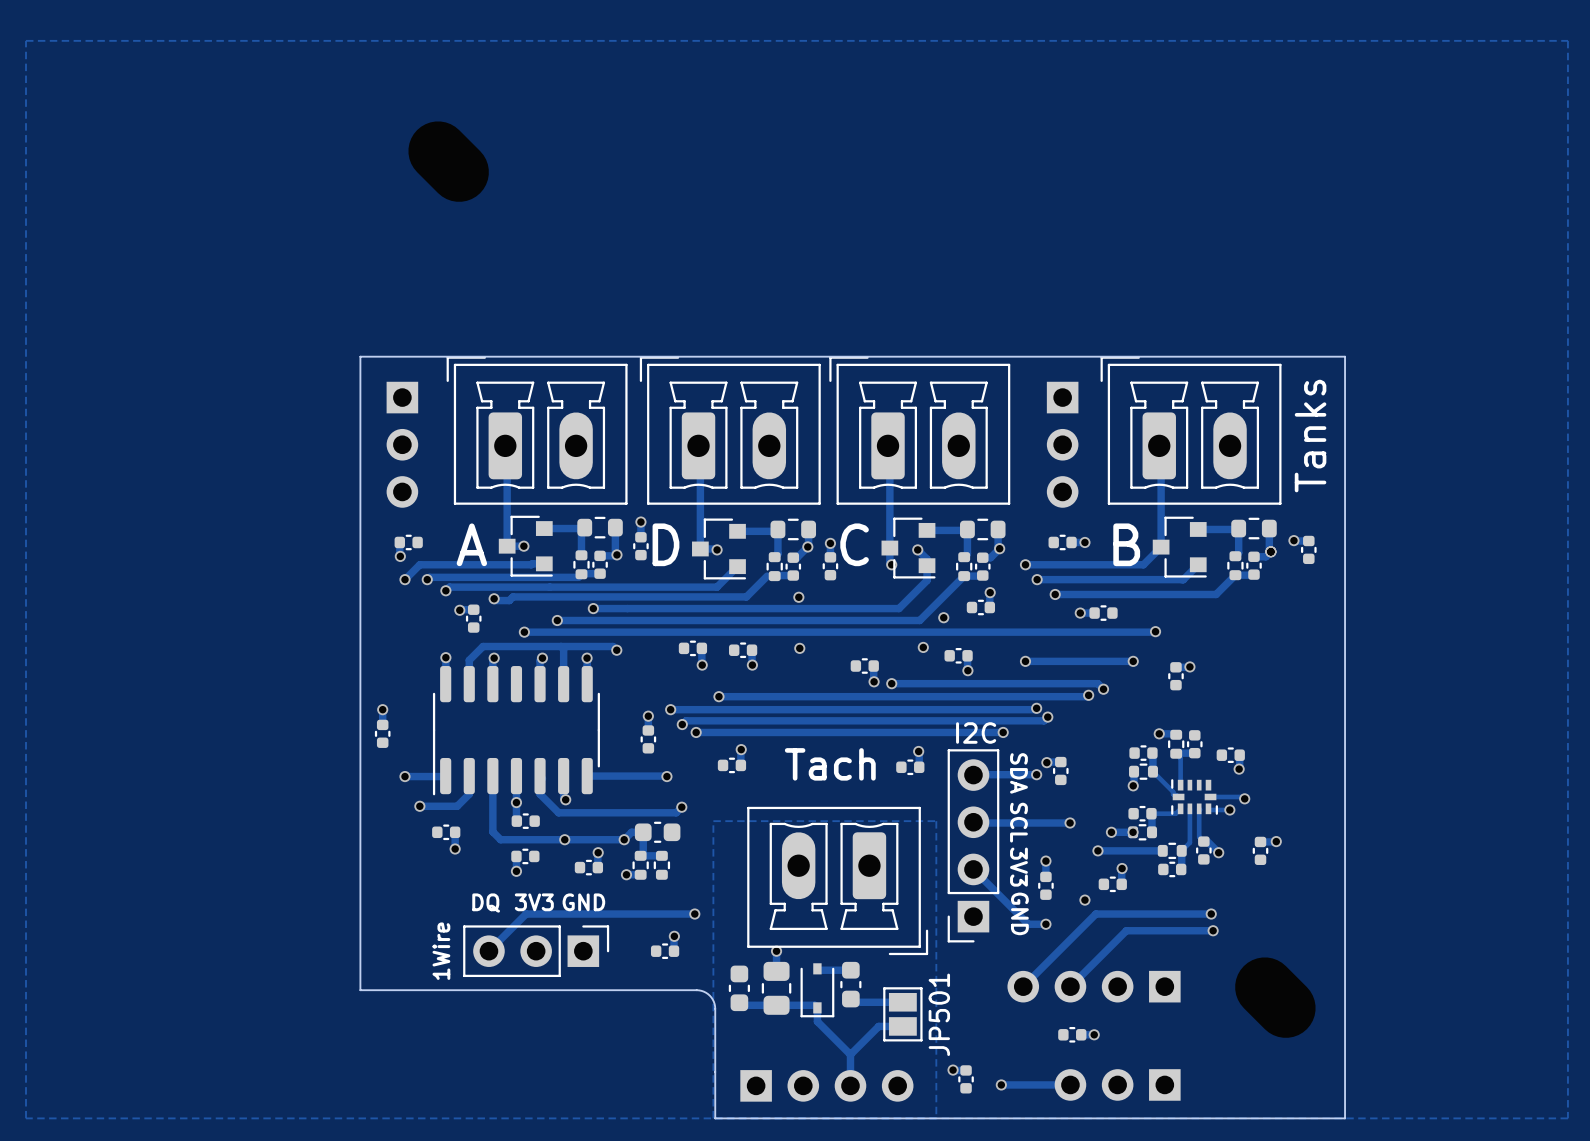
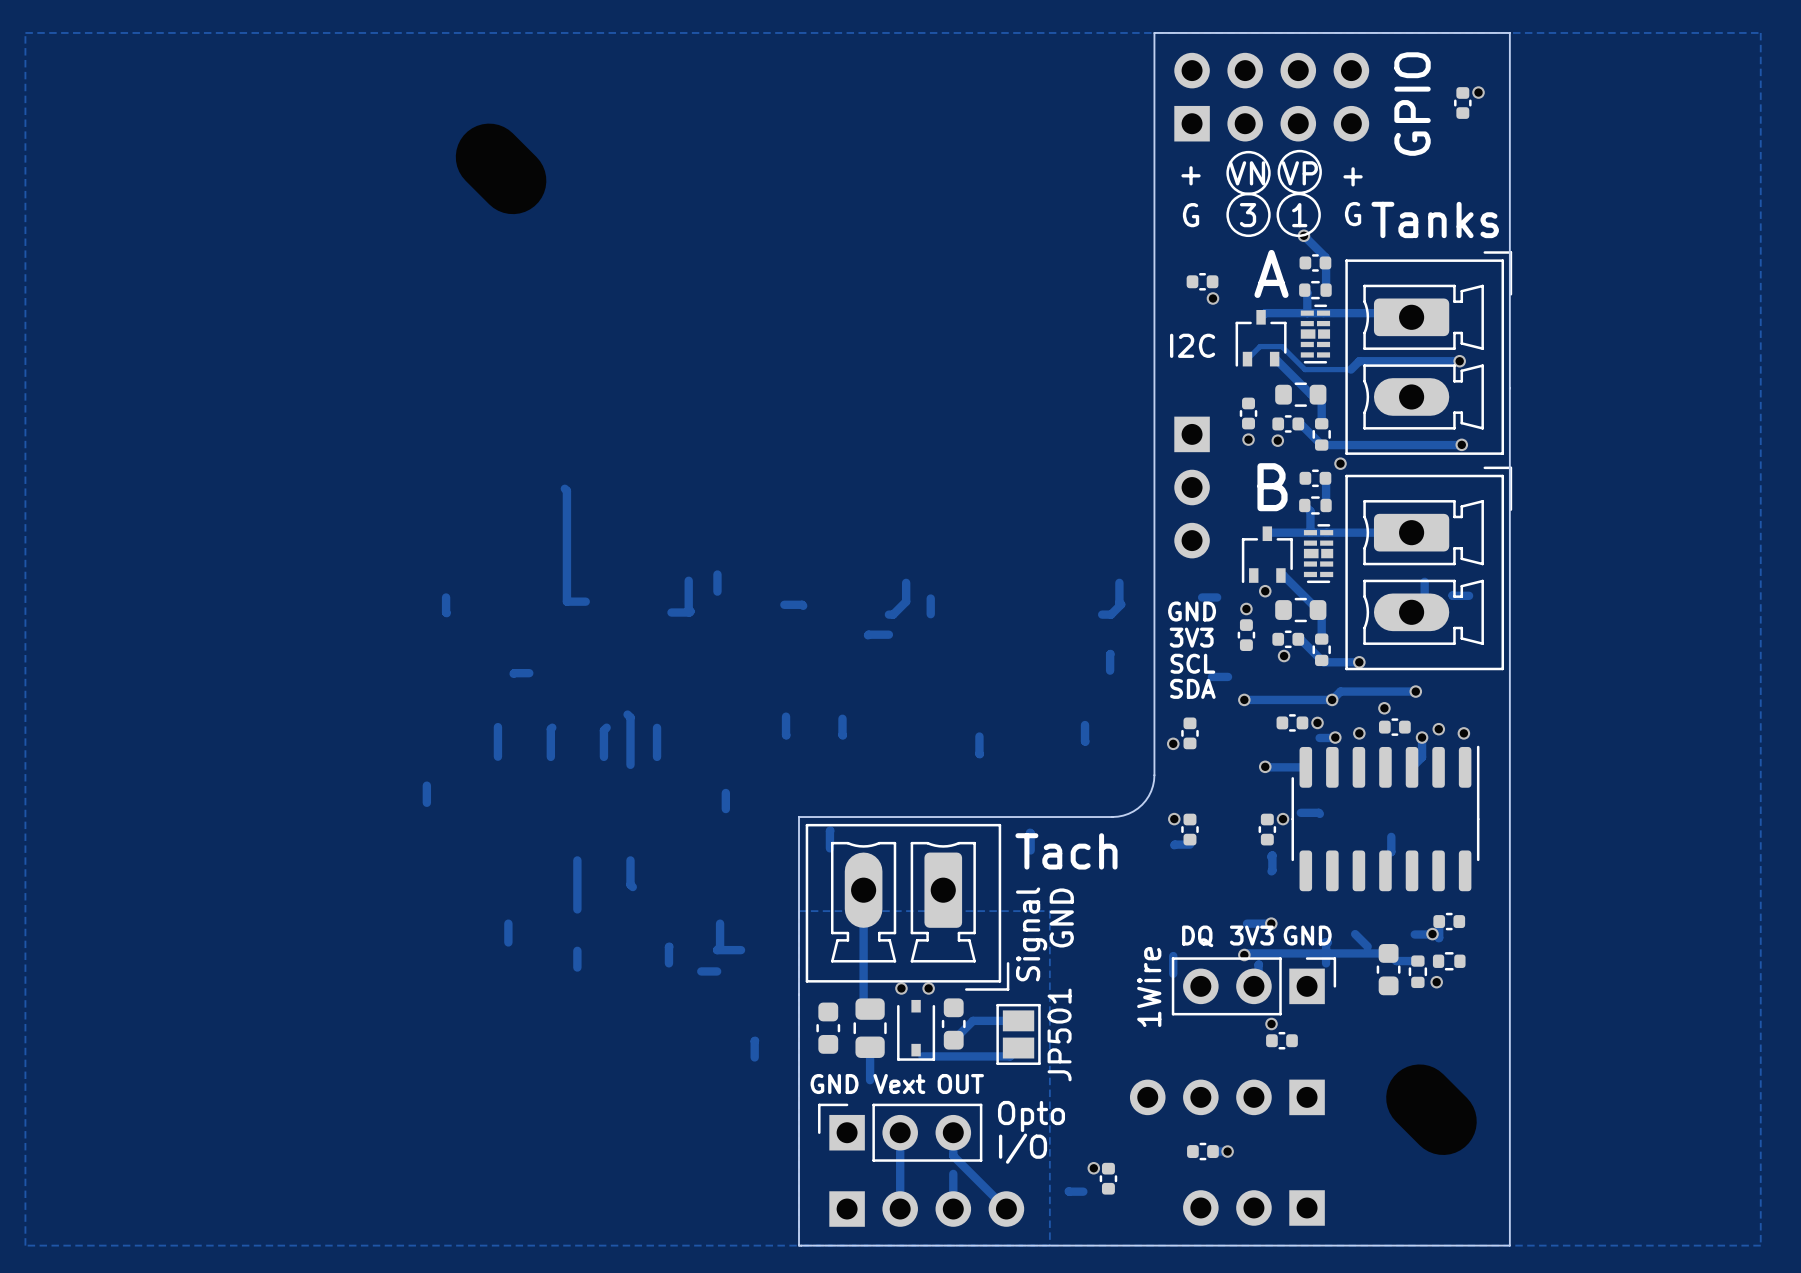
via: none -> (1478, 92)
part: none -> (1271, 97)
part: none -> (1462, 103)
text: none -> GPIO (1412, 104)
drawing: none -> [1226, 149, 1322, 238]
text: none -> VN (1247, 173)
text: none -> VP (1299, 173)
text: none -> + (1191, 175)
text: none -> + (1353, 176)
text: none -> G (1353, 214)
text: none -> G (1191, 215)
text: none -> 3 (1248, 215)
text: none -> 1 (1299, 215)
track: none -> (1303, 235) (1325, 257) (1326, 290)
via: none -> (1303, 235)
part: none -> (1315, 262)
text: none -> A (1271, 273)
part: none -> (1202, 281)
track: none -> (1304, 290) (1307, 292) (1307, 313)
part: none -> (1315, 290)
via: none -> (1212, 298)
track: none -> (1261, 317) (1265, 313) (1407, 313) (1411, 317)
part: none -> (1315, 334)
part: none -> (1261, 338)
part: none -> (1428, 353)
track: none -> (1247, 359) (1260, 346) (1281, 346) (1304, 369) (1350, 369) (1359, 361) (1459, 361)
track: none -> (1274, 359) (1311, 394) (1318, 394) (1321, 398) (1321, 423)
via: none -> (1459, 361)
board edge: (1345, 356) (360, 356) (360, 990) (703, 991) (711, 997) (715, 1006) (715, 1118) -> (1509, 388) (1509, 32) (1154, 32) (1153, 786) (1142, 804) (1133, 811) (1118, 816) (799, 817) (799, 1245) (801, 1245)
part: none -> (1300, 394)
part: none -> (1248, 413)
part: none -> (1288, 423)
track: none -> (1298, 423) (1300, 423) (1321, 445) (1461, 445)
part: none -> (1321, 434)
via: none -> (1248, 439)
via: none -> (1277, 440)
via: none -> (1461, 444)
via: none -> (1340, 463)
part: (537, 430) -> none
part: (730, 430) -> none
part: (919, 430) -> none
part: (1191, 430) -> none
part: none -> (1315, 478)
track: none -> (1325, 478) (1326, 505)
text rotation: 0° (1310, 436) -> 90° clockwise (1435, 219)
text position: Tanks (1310, 436) -> Tanks (1435, 219)
part: (402, 444) -> none
track: (698, 445) (700, 447) (699, 549) -> none
track: (888, 445) (889, 447) (889, 562) (891, 564) -> none
track: (1159, 445) (1161, 447) (1161, 547) (1143, 564) (1025, 564) -> none
track: none -> (1304, 505) (1310, 511) (1310, 532)
part: none -> (1315, 505)
track: none -> (1411, 532) (1267, 533)
part: none -> (1318, 553)
part: none -> (1267, 554)
part: none -> (1428, 568)
via: (640, 522) -> none
track: none -> (1280, 575) (1283, 575) (1321, 613) (1321, 639)
track: (584, 527) (581, 530) (581, 555) -> none
part: (600, 527) -> none
track: (544, 528) (583, 528) -> none
part: (1254, 528) -> none
part: (793, 529) -> none
part: (982, 529) -> none
track: (1198, 529) (1238, 528) (1238, 552) (1235, 556) -> none
track: (927, 530) (967, 529) (967, 553) (964, 557) -> none
track: (737, 531) (776, 531) (777, 529) (777, 553) (774, 557) -> none
via: none -> (1265, 591)
via: (1293, 540) -> none
part: (408, 542) -> none
part: (1062, 542) -> none
via: (1084, 542) -> none
via: (830, 543) -> none
text: A (471, 544) -> none
text: D (665, 544) -> none
text: C (854, 544) -> none
text position: B (1126, 544) -> B (1272, 487)
via: (523, 546) -> none
part: (525, 546) -> none
part: (640, 546) -> none
via: (807, 546) -> none
part: (1179, 547) -> none
part: (719, 548) -> none
part: (908, 548) -> none
via: (999, 548) -> none
via: (717, 549) -> none
track: (917, 549) (927, 559) (927, 580) (899, 608) (593, 608) -> none
via: (917, 549) -> none
part: (1308, 549) -> none
via: (1270, 551) -> none
via: none -> (1246, 608)
part: none -> (1300, 610)
via: (616, 554) -> none
text: none -> GND (1192, 611)
via: (400, 556) -> none
track: (544, 563) (419, 564) (404, 579) -> none
part: (581, 564) -> none
part: (600, 564) -> none
via: (891, 564) -> none
via: (1025, 564) -> none
track: (1198, 564) (1183, 579) (1159, 579) -> (1359, 662) (1323, 662) (1300, 639)
part: (1235, 565) -> none
part: (1254, 565) -> none
track: (737, 566) (717, 587) (449, 587) (445, 590) -> none
part: (774, 566) -> none
part: (793, 566) -> none
part: (830, 566) -> none
part: (964, 566) -> none
part: (982, 566) -> none
track: (600, 573) (582, 573) (578, 577) (429, 577) (427, 579) -> none
track: (1254, 574) (1235, 575) (1216, 594) (1055, 594) -> none
track: (982, 575) (964, 576) (919, 620) (557, 620) -> none
part: none -> (1246, 635)
track: (767, 576) (746, 596) (513, 596) (509, 600) (494, 600) -> none
text: none -> 3V3 (1191, 637)
via: (404, 579) -> none
via: (427, 579) -> none
track: (1037, 579) (1157, 579) -> none
via: (1037, 579) -> none
part: none -> (1288, 639)
part: none -> (1321, 649)
via: (445, 590) -> none
via: (990, 592) -> none
via: (1055, 594) -> none
via: none -> (1284, 656)
via: (798, 597) -> none
via: (494, 598) -> none
via: none -> (1359, 662)
part: (980, 607) -> none
via: (593, 608) -> none
via: (459, 610) -> none
via: (1080, 613) -> none
part: (1103, 613) -> none
via: (943, 617) -> none
part: (473, 618) -> none
via: (557, 620) -> none
track: none -> (1415, 691) (1340, 691) (1332, 699) (1244, 699)
via: none -> (1415, 691)
track: (1155, 631) (524, 632) -> none
via: (1155, 631) -> none
via: (524, 632) -> none
via: none -> (1244, 699)
via: none -> (1332, 699)
via: none -> (1384, 708)
via: (923, 647) -> none
part: (692, 648) -> none
via: (799, 648) -> none
track: (616, 650) (613, 646) (483, 646) (469, 660) (469, 684) -> none
via: (616, 650) -> none
part: (743, 650) -> none
part: none -> (1292, 722)
via: none -> (1317, 722)
part: (958, 655) -> none
via: (445, 657) -> none
part: none -> (1394, 727)
via: (494, 658) -> none
via: (542, 658) -> none
via: (587, 658) -> none
via: none -> (1438, 729)
track: (1025, 661) (1133, 661) -> none
via: (1025, 661) -> none
via: (1133, 661) -> none
part: none -> (1189, 733)
via: none -> (1359, 733)
via: none -> (1463, 733)
via: (702, 665) -> none
via: (752, 665) -> none
part: (864, 666) -> none
track: none -> (1422, 737) (1422, 757) (1412, 767)
via: none -> (1422, 737)
via: (967, 670) -> none
via: none -> (1173, 743)
part: (1175, 676) -> none
via: (874, 681) -> none
track: (891, 683) (1097, 683) (1103, 689) -> none
via: (891, 683) -> none
via: (1103, 689) -> none
track: none -> (1265, 766) (1305, 767)
via: none -> (1265, 766)
track: (1088, 695) (718, 696) -> none
via: (1088, 695) -> none
via: (718, 696) -> none
track: (1036, 708) (670, 709) -> none
via: (1036, 708) -> none
via: (382, 709) -> none
via: (670, 709) -> none
via: (648, 716) -> none
track: (1047, 717) (1044, 720) (686, 720) (682, 724) -> none
via: (1047, 717) -> none
via: (682, 724) -> none
part: (516, 730) -> none
track: (696, 732) (1003, 732) -> none
via: (696, 732) -> none
via: (1003, 732) -> none
part: (382, 733) -> none
text position: I2C (976, 733) -> I2C (1192, 345)
via position: (1159, 733) -> (1283, 819)
part: (648, 739) -> none
via: none -> (1174, 819)
part: (1176, 744) -> none
part: (1194, 744) -> none
part footprint: [1216, 747, 1245, 763] -> [1291, 745, 1480, 892]
via: (741, 749) -> none
via: (918, 751) -> none
part rotation: 0° (1143, 753) -> 90° clockwise (1267, 829)
track: (1152, 753) (1152, 771) (1173, 791) (1174, 795) (1178, 796) -> none
track: (1193, 753) (1176, 753) (1180, 758) (1180, 785) -> none
track: (492, 761) (492, 831) (500, 839) (624, 839) (631, 832) (643, 832) (641, 830) -> none
via: (1046, 762) -> none
text position: Tach (830, 764) -> Tach (1066, 851)
part: (731, 765) -> none
part: (910, 767) -> none
via: (1239, 769) -> none
part position: (1060, 770) -> (1189, 829)
part: (1143, 771) -> none
text rotation: 0° (1018, 773) -> 90° counterclockwise (1192, 688)
text position: SDA (1018, 773) -> SDA (1192, 688)
track: (1036, 774) (973, 775) -> none
via: (1036, 774) -> none
via: (404, 776) -> none
track: (445, 776) (404, 776) -> none
track: (469, 776) (469, 794) (457, 806) (419, 806) -> none
track: (587, 776) (666, 776) -> none
via: (666, 776) -> none
track: (542, 778) (540, 776) (540, 794) (558, 812) (676, 812) (681, 807) -> none
via: (1133, 785) -> none
part: (1194, 796) -> none
track: (1210, 796) (1242, 796) (1244, 798) -> none
via: (1244, 798) -> none
via: (565, 799) -> none
via: (516, 802) -> none
track: none -> (863, 890) (863, 1002) (870, 1009)
via: (419, 806) -> none
via: (681, 807) -> none
track: (1180, 808) (1175, 813) (1151, 813) (1152, 832) -> none
track: (1189, 808) (1189, 842) (1181, 850) -> none
track: (1208, 808) (1229, 809) -> none
track: (1200, 809) (1199, 836) (1203, 841) -> none
via: (1229, 809) -> none
part: (1142, 813) -> none
part: (525, 821) -> none
track: (973, 822) (1070, 823) -> none
text rotation: 0° (1018, 822) -> 90° counterclockwise (1192, 663)
text position: SCL (1018, 822) -> SCL (1192, 663)
via: (1070, 823) -> none
text: none -> GND (1061, 917)
track: none -> (1439, 921) (1438, 938)
part: (446, 832) -> none
part: (657, 832) -> none
via: (1111, 832) -> none
part: (1142, 832) -> none
via: (564, 839) -> none
via: (624, 839) -> none
text: none -> Signal (1031, 934)
text: none -> GND (1307, 935)
text: none -> DQ (1197, 936)
part: (973, 845) -> none
via: (455, 849) -> none
track: (1097, 850) (1161, 850) -> none
via position: (1097, 850) -> (1244, 955)
part: (1172, 850) -> none
part: (1203, 850) -> none
part rotation: 0° (1260, 850) -> 90° clockwise (1449, 921)
part position: (1260, 850) -> (1449, 921)
via: (598, 852) -> none
via: (1218, 852) -> none
part: (525, 856) -> none
track: none -> (1244, 955) (1245, 953) (1388, 953) (1396, 961) (1417, 961)
via: (1045, 861) -> none
part: (640, 865) -> none
part: (661, 865) -> none
part: none -> (1449, 961)
part: (588, 867) -> none
text rotation: 0° (1018, 867) -> 90° counterclockwise (1251, 935)
text position: 3V3 (1018, 867) -> 3V3 (1251, 935)
via: (1122, 868) -> none
track: (973, 869) (1028, 924) (1045, 924) -> none
part: (1172, 869) -> none
via: (516, 871) -> none
part: none -> (1388, 969)
via: (626, 874) -> none
part: none -> (1417, 971)
part footprint: [1098, 876, 1127, 893] -> [1171, 957, 1337, 1016]
part position: (837, 880) -> (907, 907)
via: none -> (1436, 982)
part: (1045, 885) -> none
text: none -> 1Wire (1149, 986)
via: none -> (901, 988)
via: none -> (928, 988)
via: (1084, 900) -> none
text: 3V3 (534, 902) -> none
text: GND (583, 902) -> none
text: DQ (486, 903) -> none
text: GND (1019, 913) -> none
track: (694, 914) (526, 914) (488, 951) -> none
via: (694, 914) -> none
track: (1211, 914) (1095, 914) (1023, 986) -> none
via: (1211, 914) -> none
track: none -> (1018, 1020) (973, 1020) (950, 1043)
part: none -> (953, 1024)
via: none -> (1271, 1024)
via: (1045, 924) -> none
part: none -> (828, 1028)
track: (1213, 930) (1126, 930) (1070, 986) -> none
via: (1213, 930) -> none
via: (674, 936) -> none
part: none -> (1281, 1040)
track: none -> (1018, 1048) (1010, 1056) (922, 1056)
text: 1Wire (441, 951) -> none
part: (536, 951) -> none
part: (665, 951) -> none
via: (776, 951) -> none
track: (817, 968) (850, 970) -> none
text: none -> GND (834, 1084)
text: none -> Vext (899, 1084)
text: none -> OUT (960, 1084)
part: (850, 984) -> none
part: (739, 988) -> none
part position: (776, 988) -> (870, 1028)
part position: (817, 990) -> (916, 1030)
track: (848, 1001) (850, 999) (854, 1002) (902, 1002) -> none
track: (739, 1002) (741, 1005) (814, 1005) (817, 1007) (817, 1021) (850, 1054) (878, 1026) (902, 1026) -> none
text: none -> Opto (1031, 1116)
JP501 position: (902, 1014) -> (1018, 1034)
track: none -> (900, 1132) (900, 1209)
part: none -> (900, 1132)
track: none -> (953, 1132) (953, 1155) (1006, 1209)
text: none -> I/O (1023, 1148)
via: none -> (1093, 1168)
via: (953, 1070) -> none
part position: (966, 1079) -> (1108, 1178)
track: (1001, 1084) (1070, 1084) -> none
via: (1001, 1084) -> none

